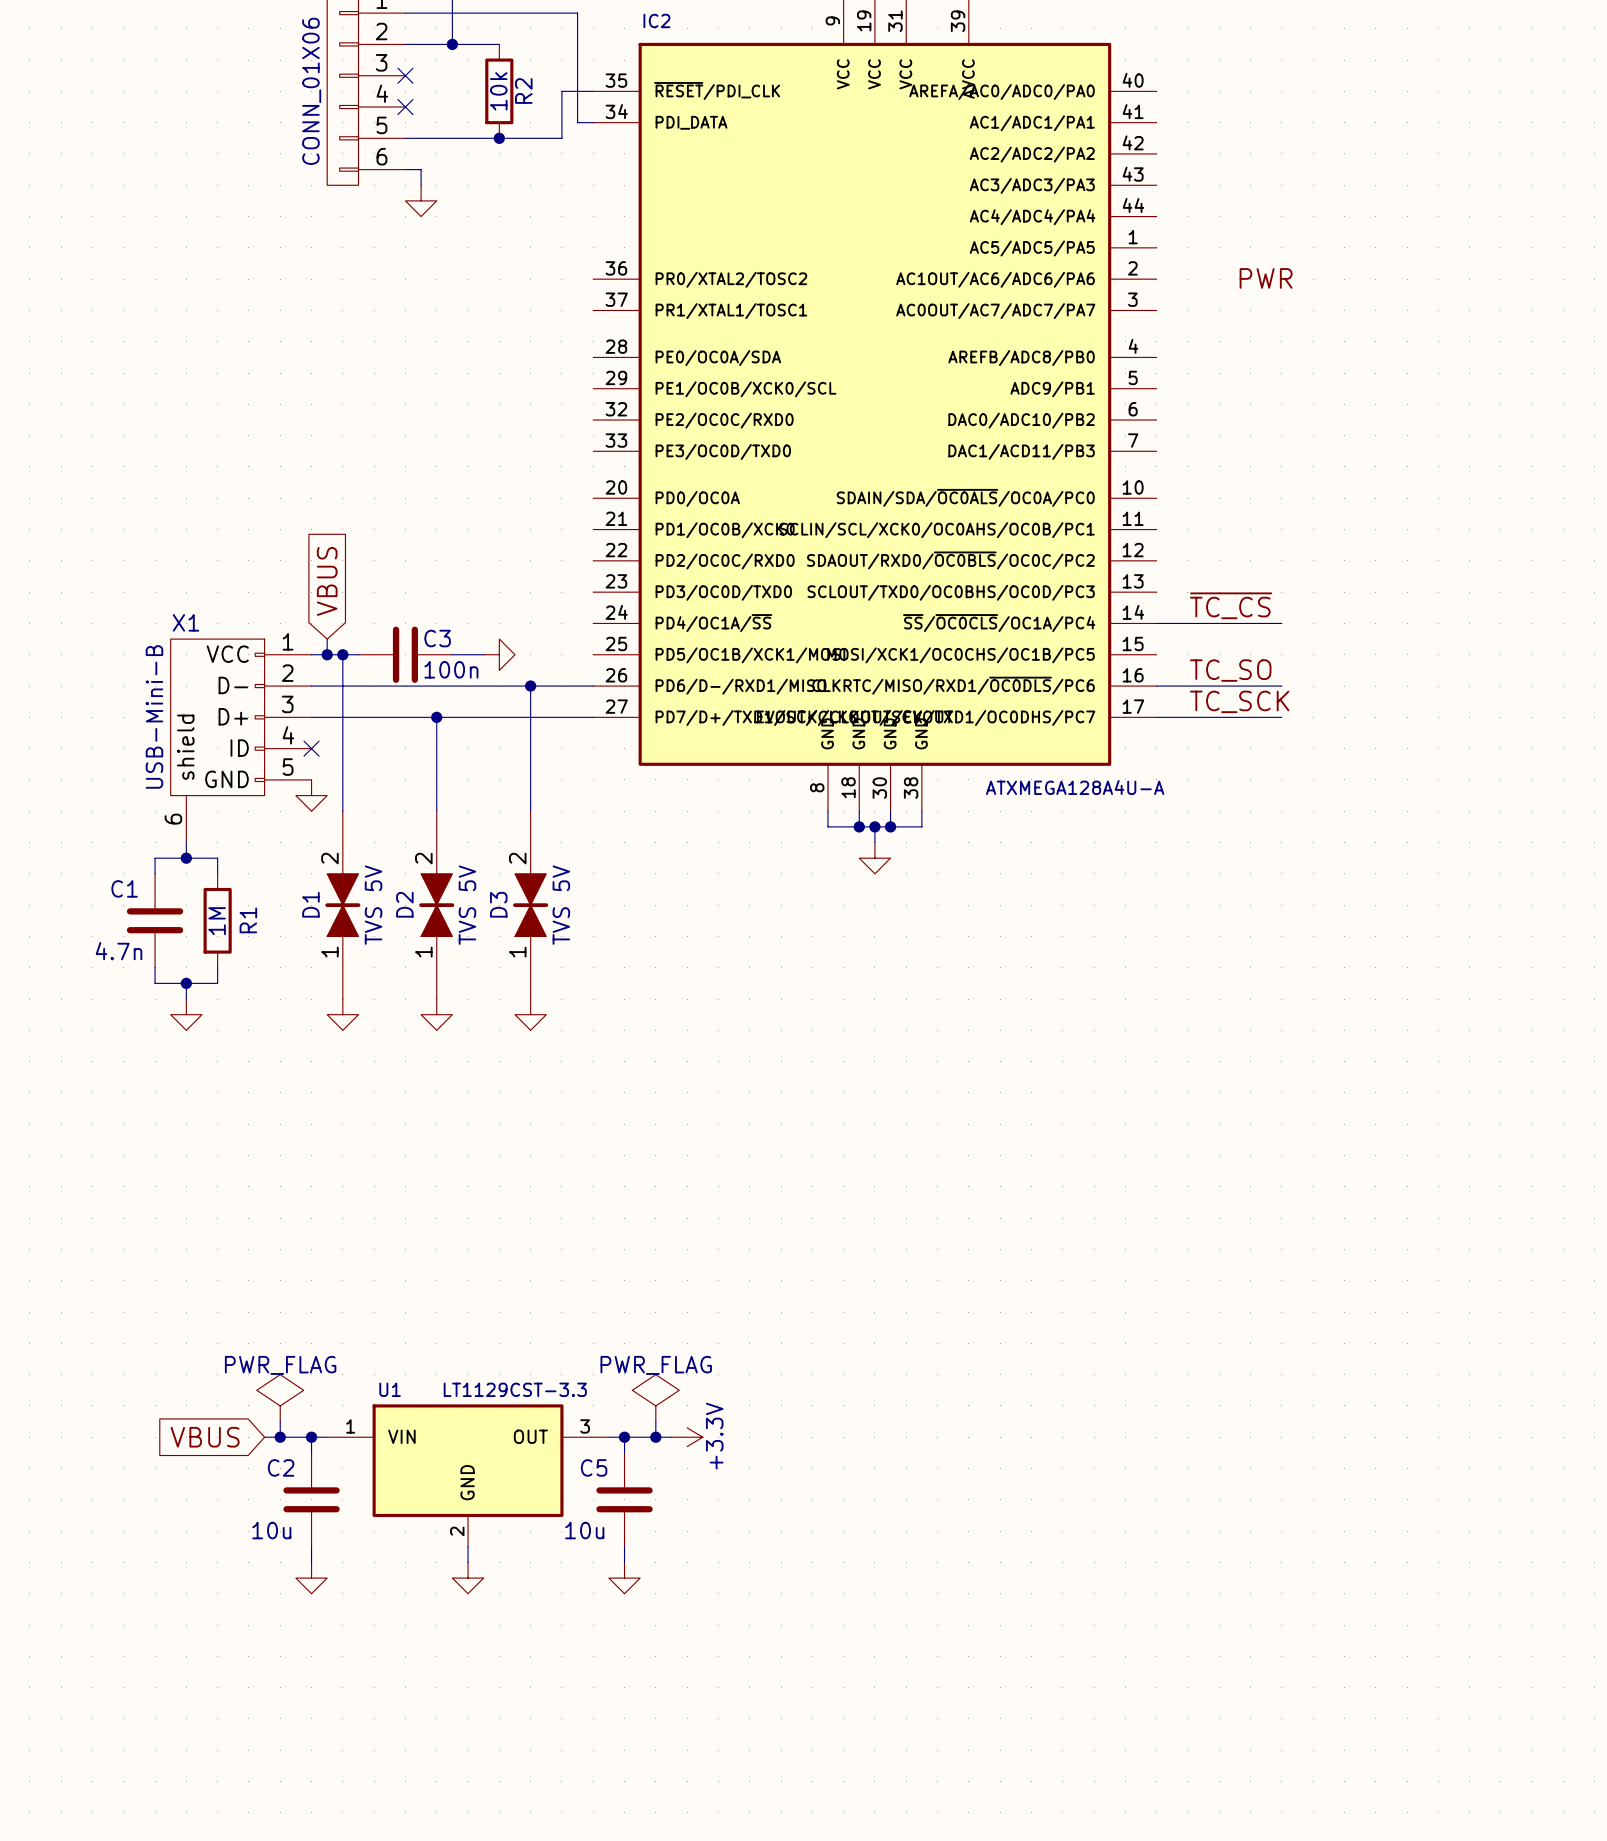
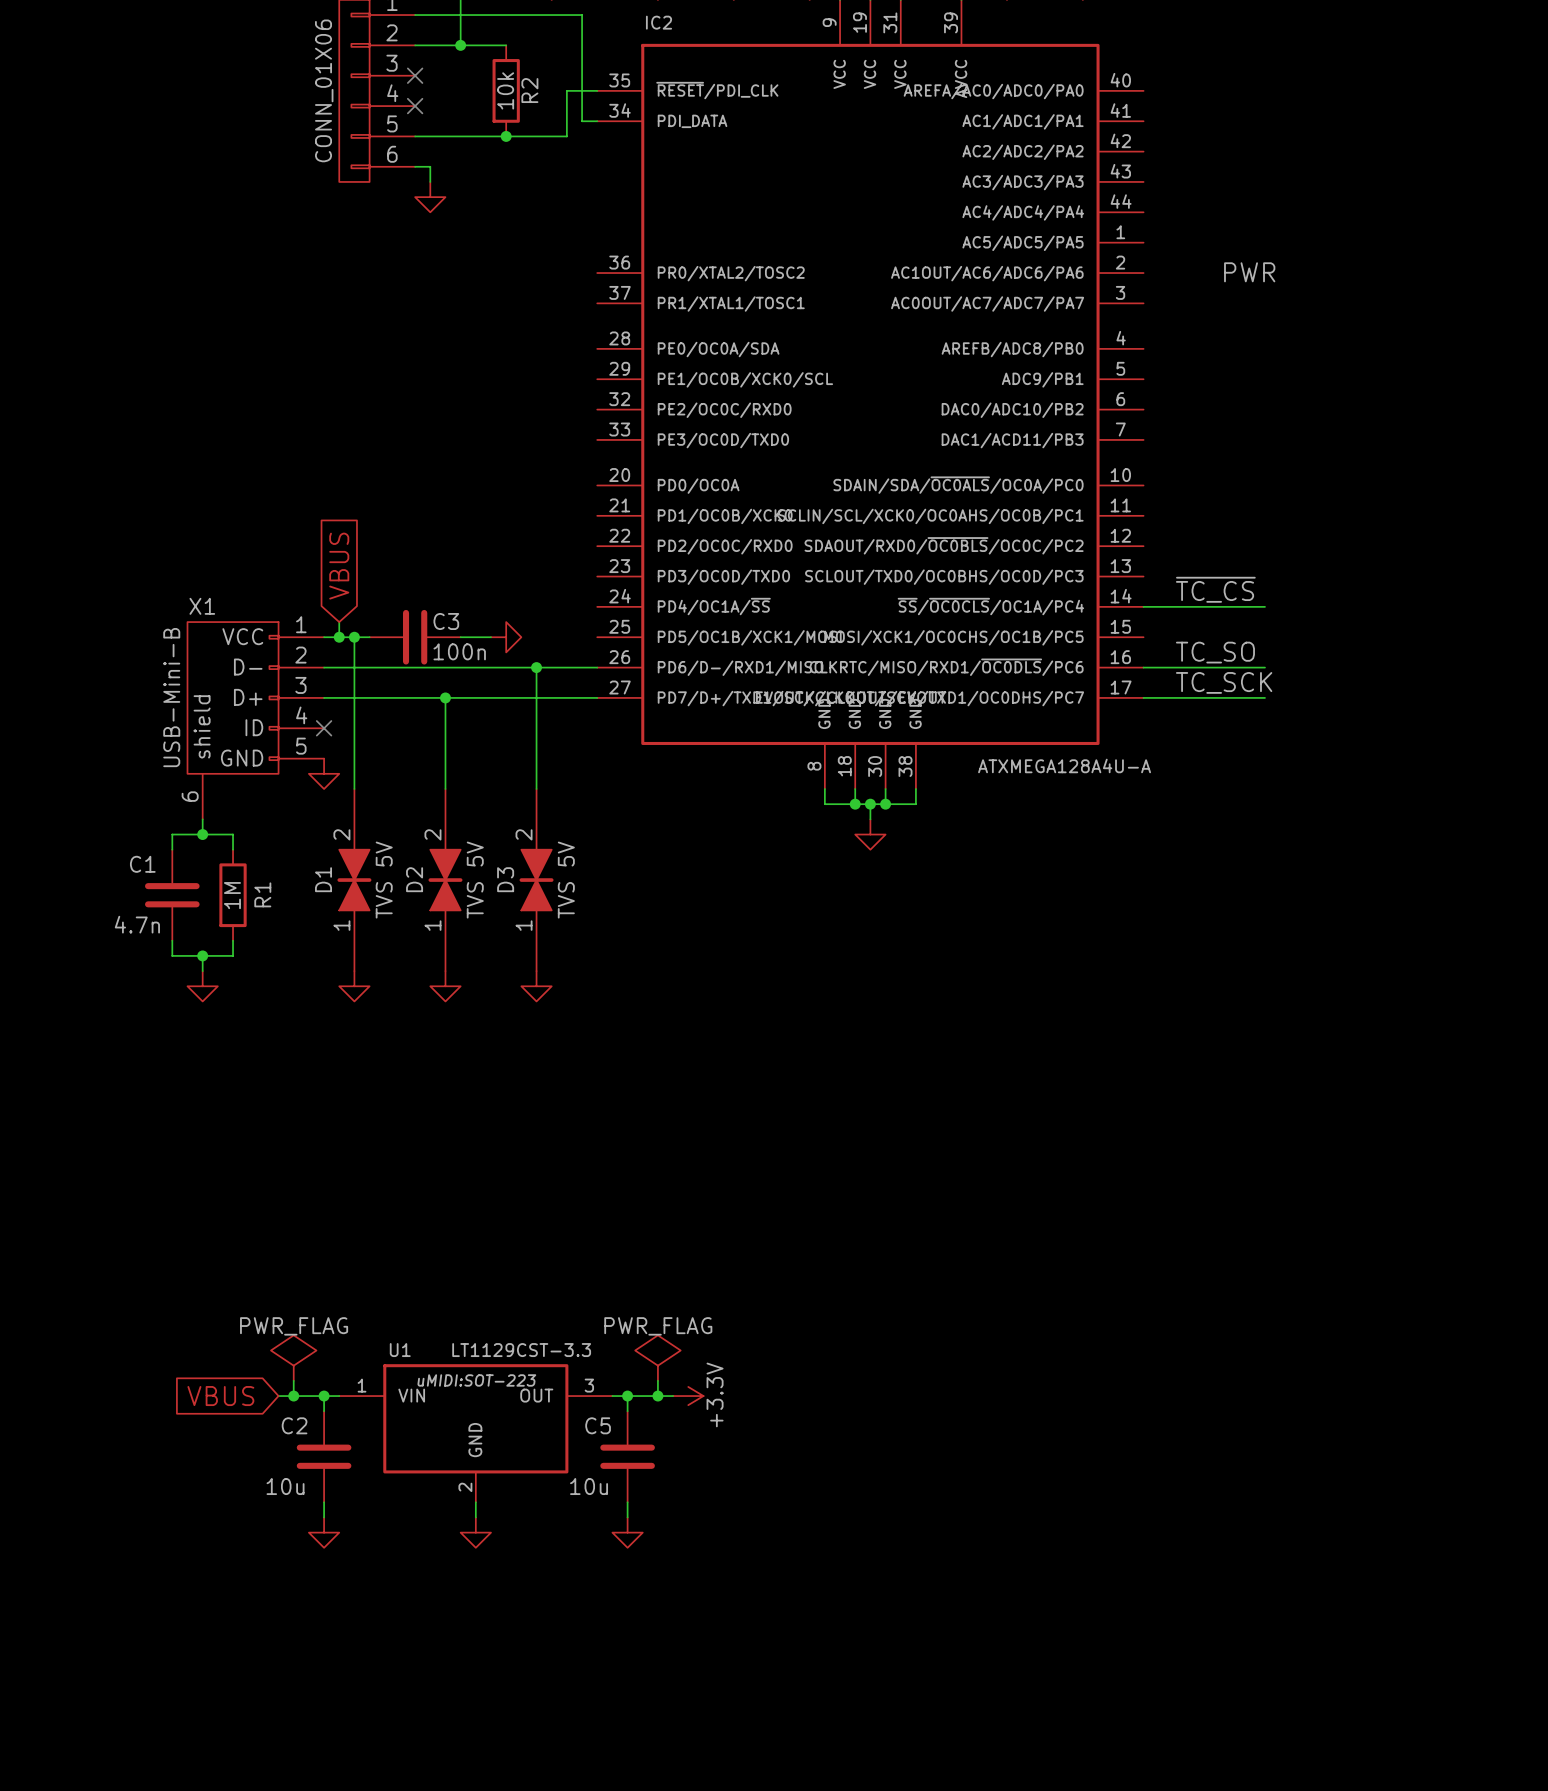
U1 text: none -> uMIDI:SOT-223 (476, 1380)

